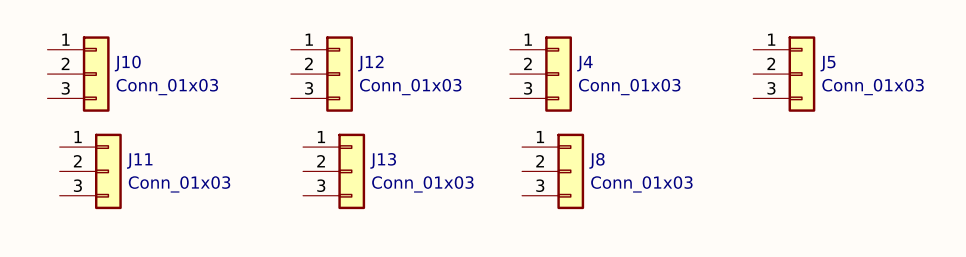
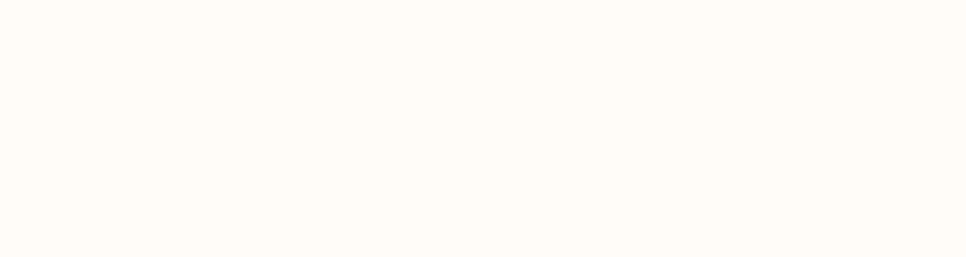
J10: Conn_01x03 (78, 74) -> none
J12: Conn_01x03 (321, 74) -> none
J4: Conn_01x03 (540, 74) -> none
J5: Conn_01x03 (784, 74) -> none
J11: Conn_01x03 (90, 171) -> none
J13: Conn_01x03 (334, 171) -> none
J8: Conn_01x03 (553, 171) -> none

